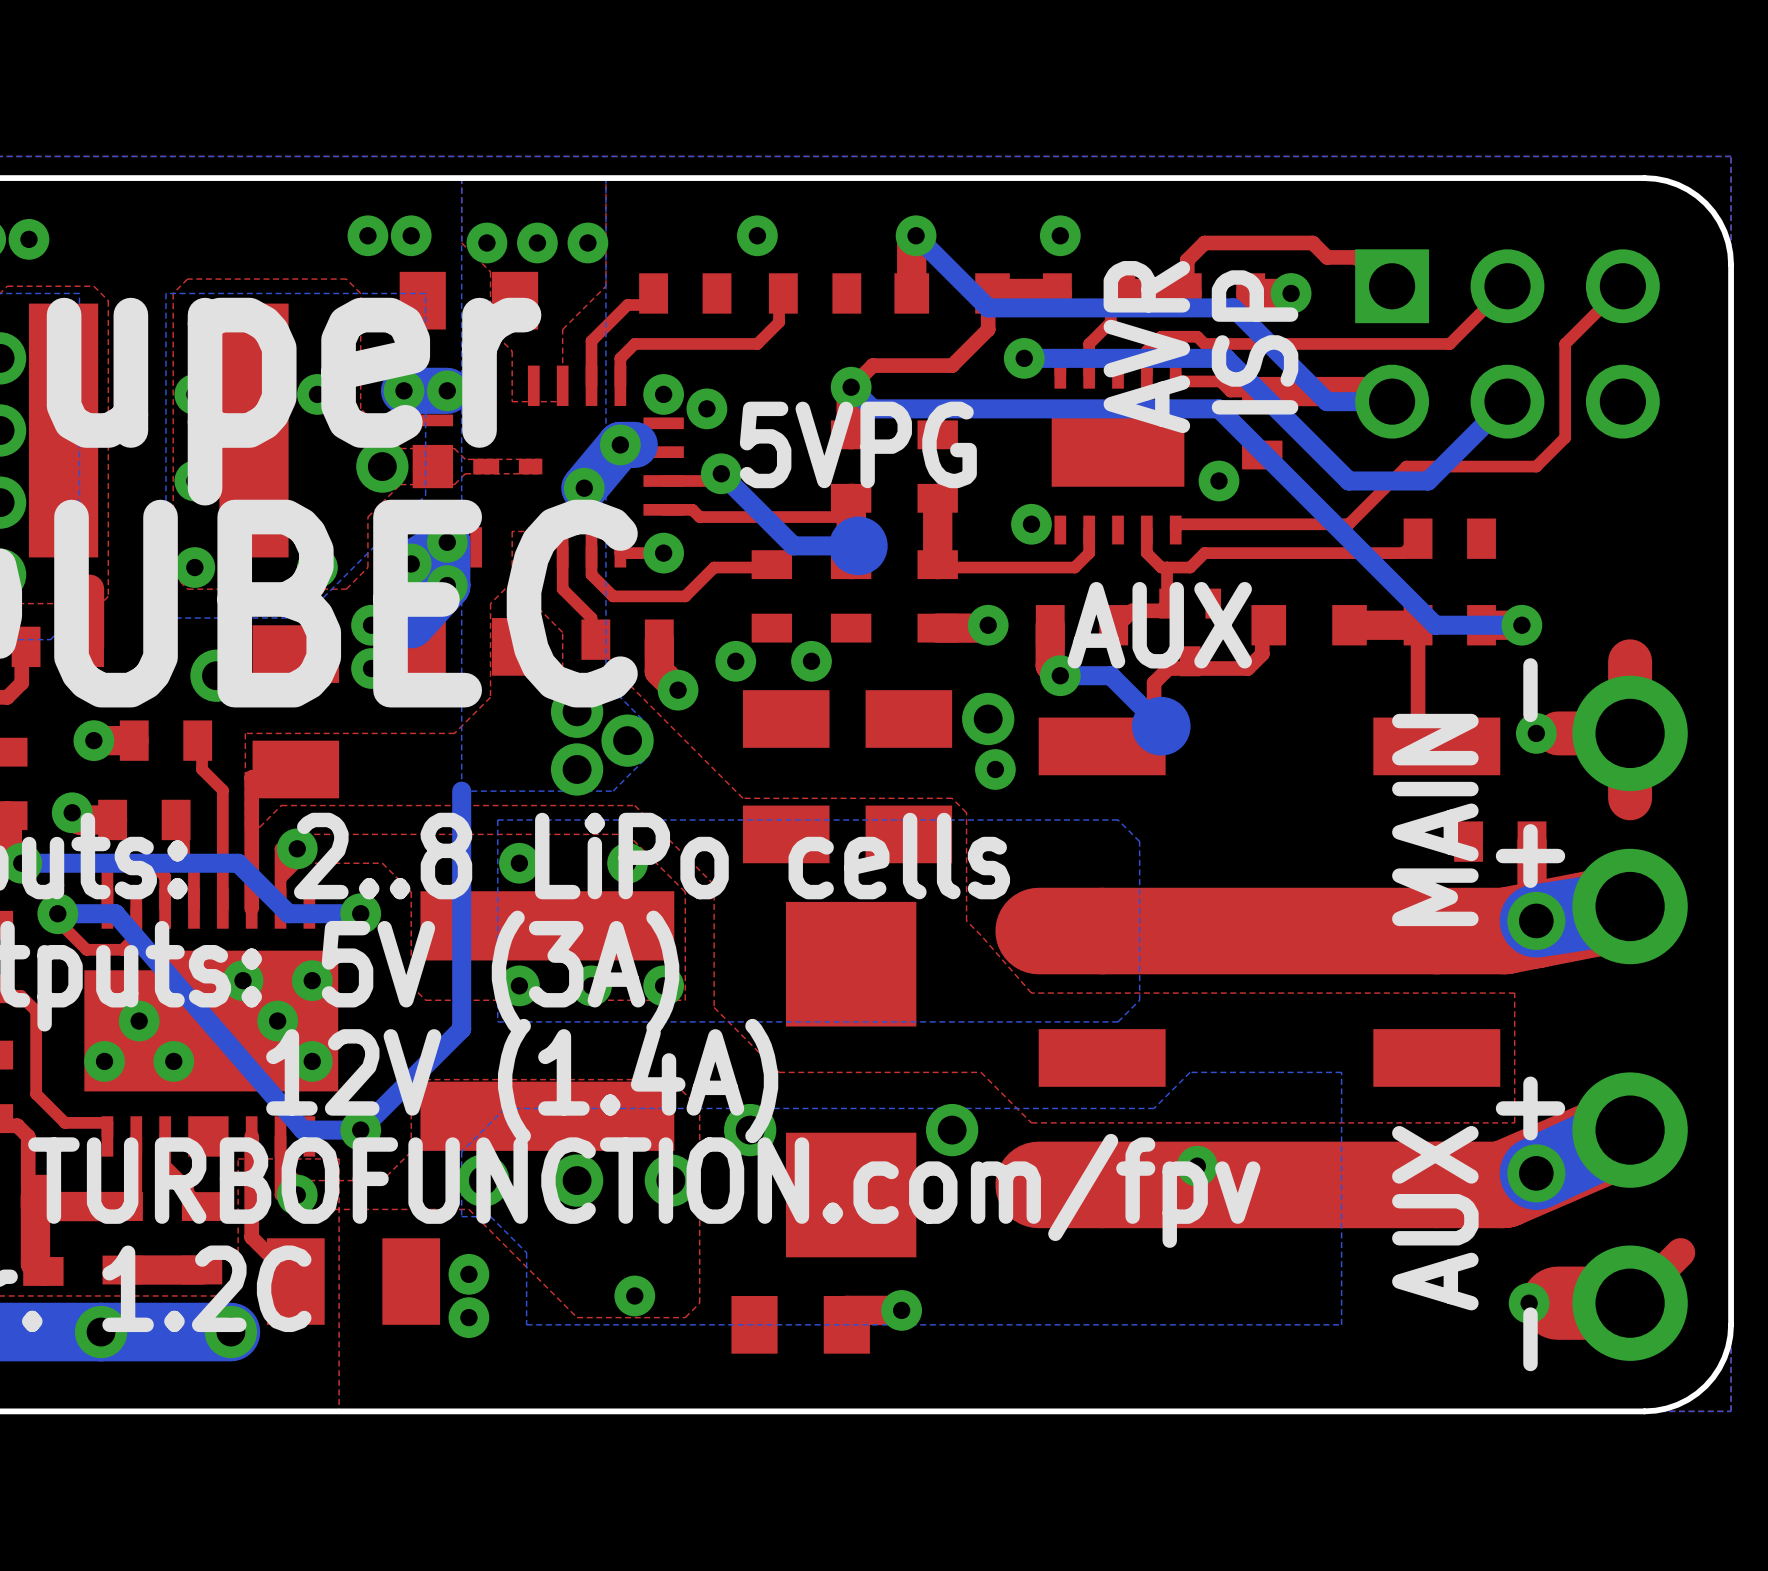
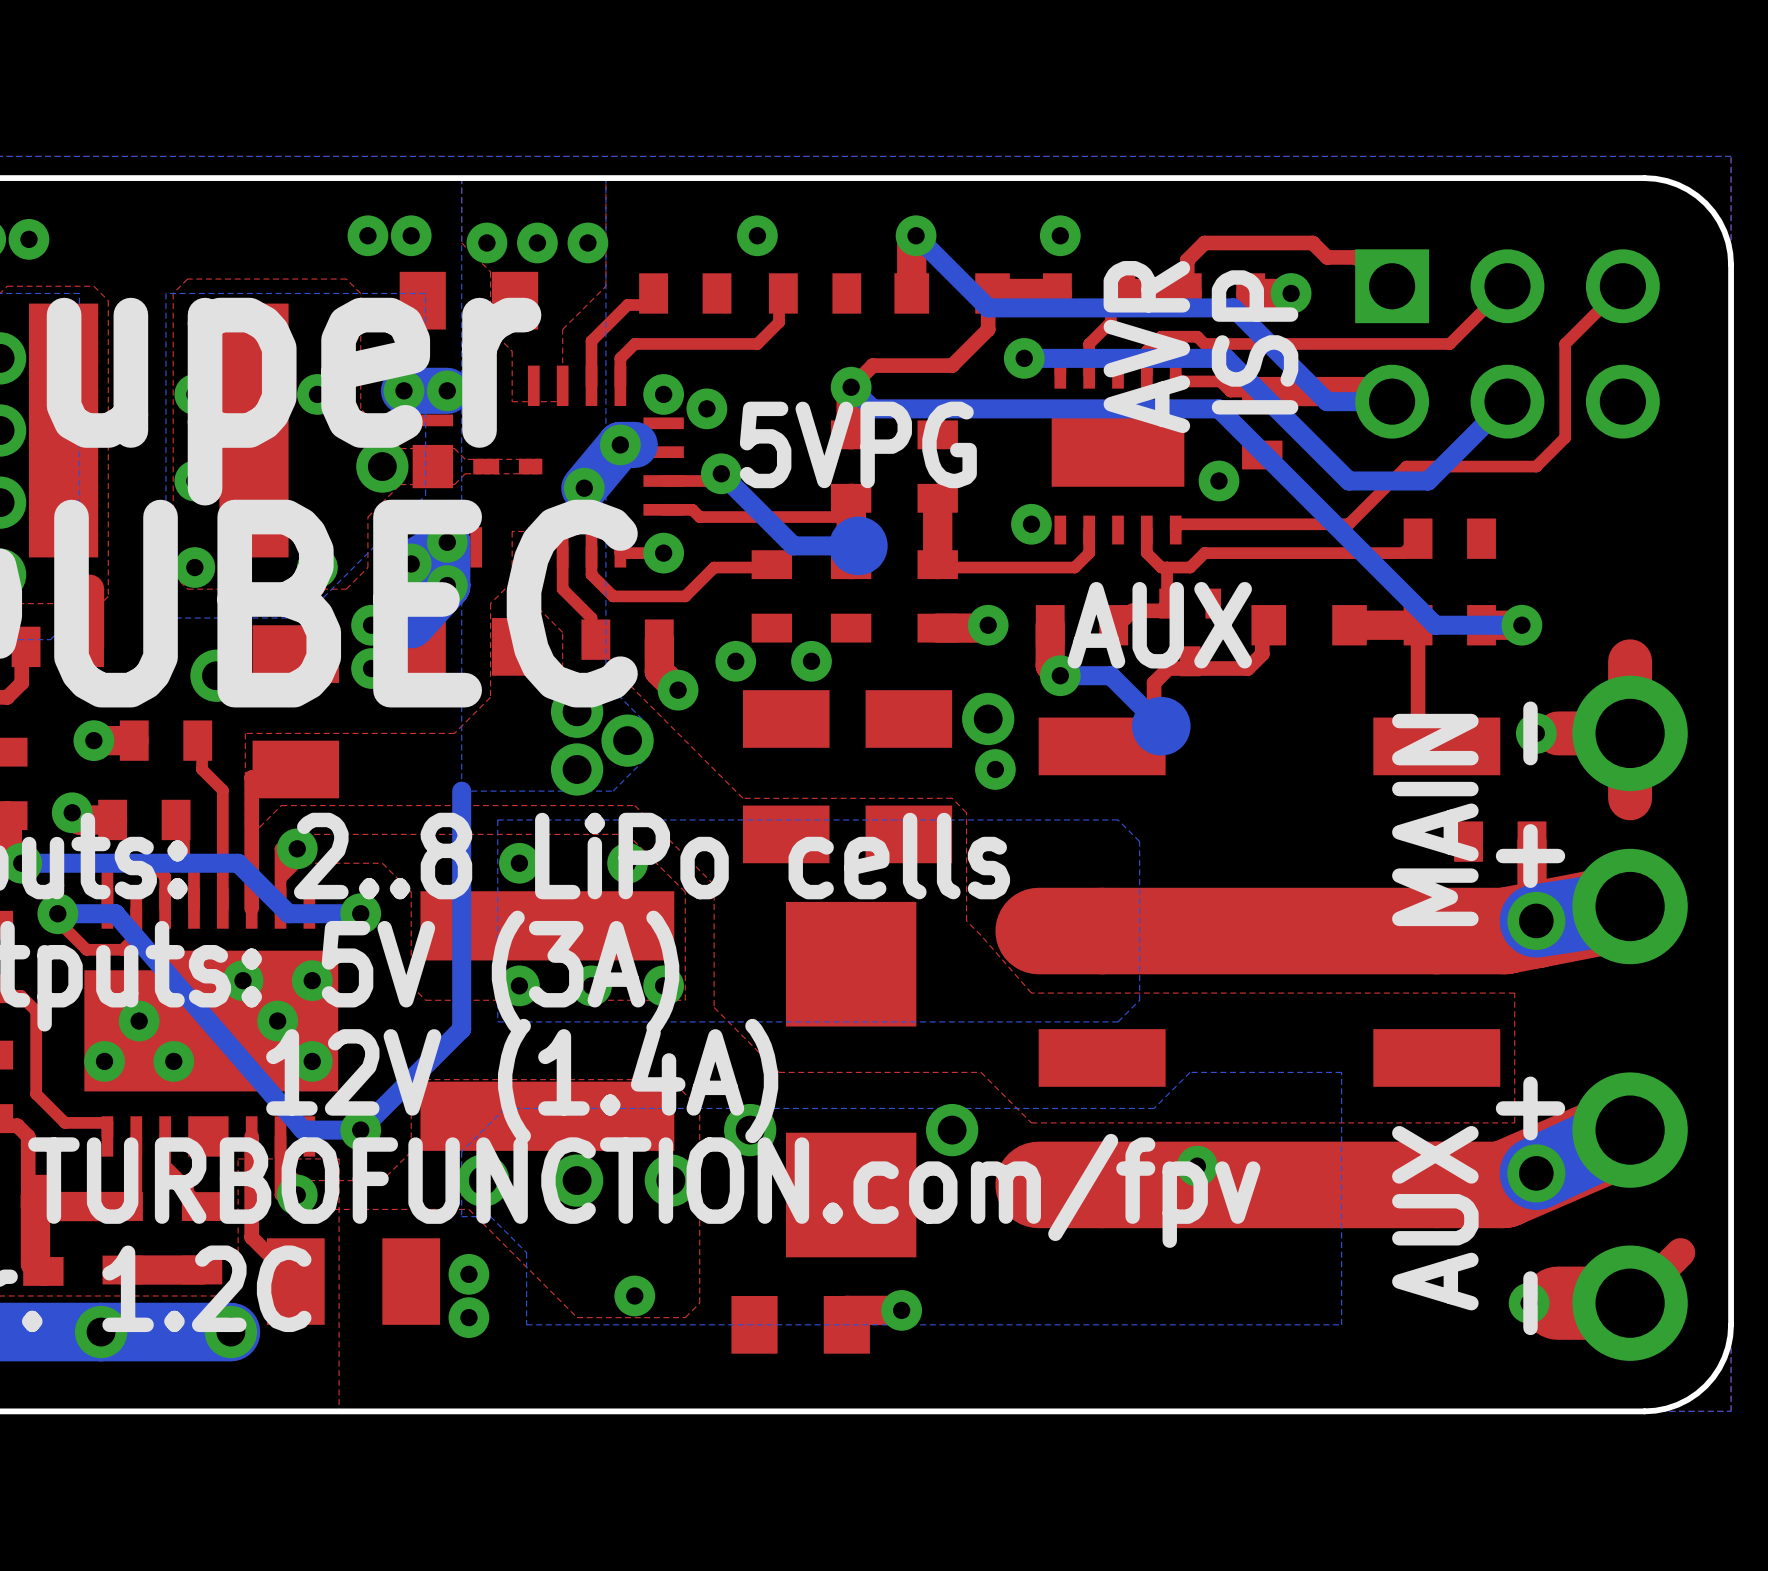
text position: - (1530, 690) -> - (1530, 733)
text position: - (1530, 1339) -> - (1530, 1303)

